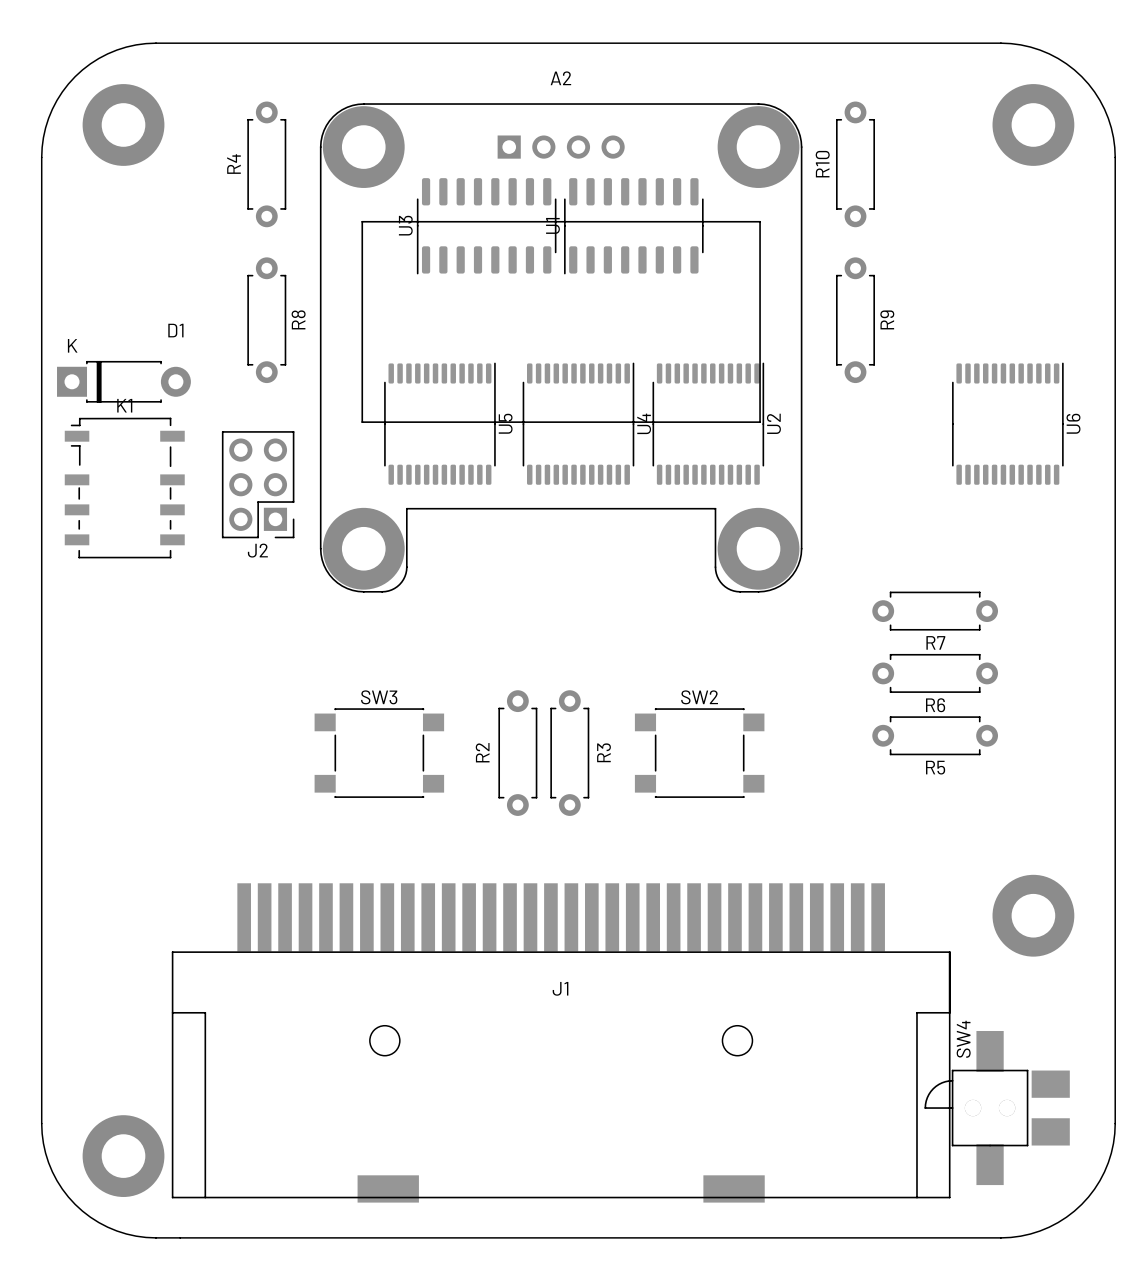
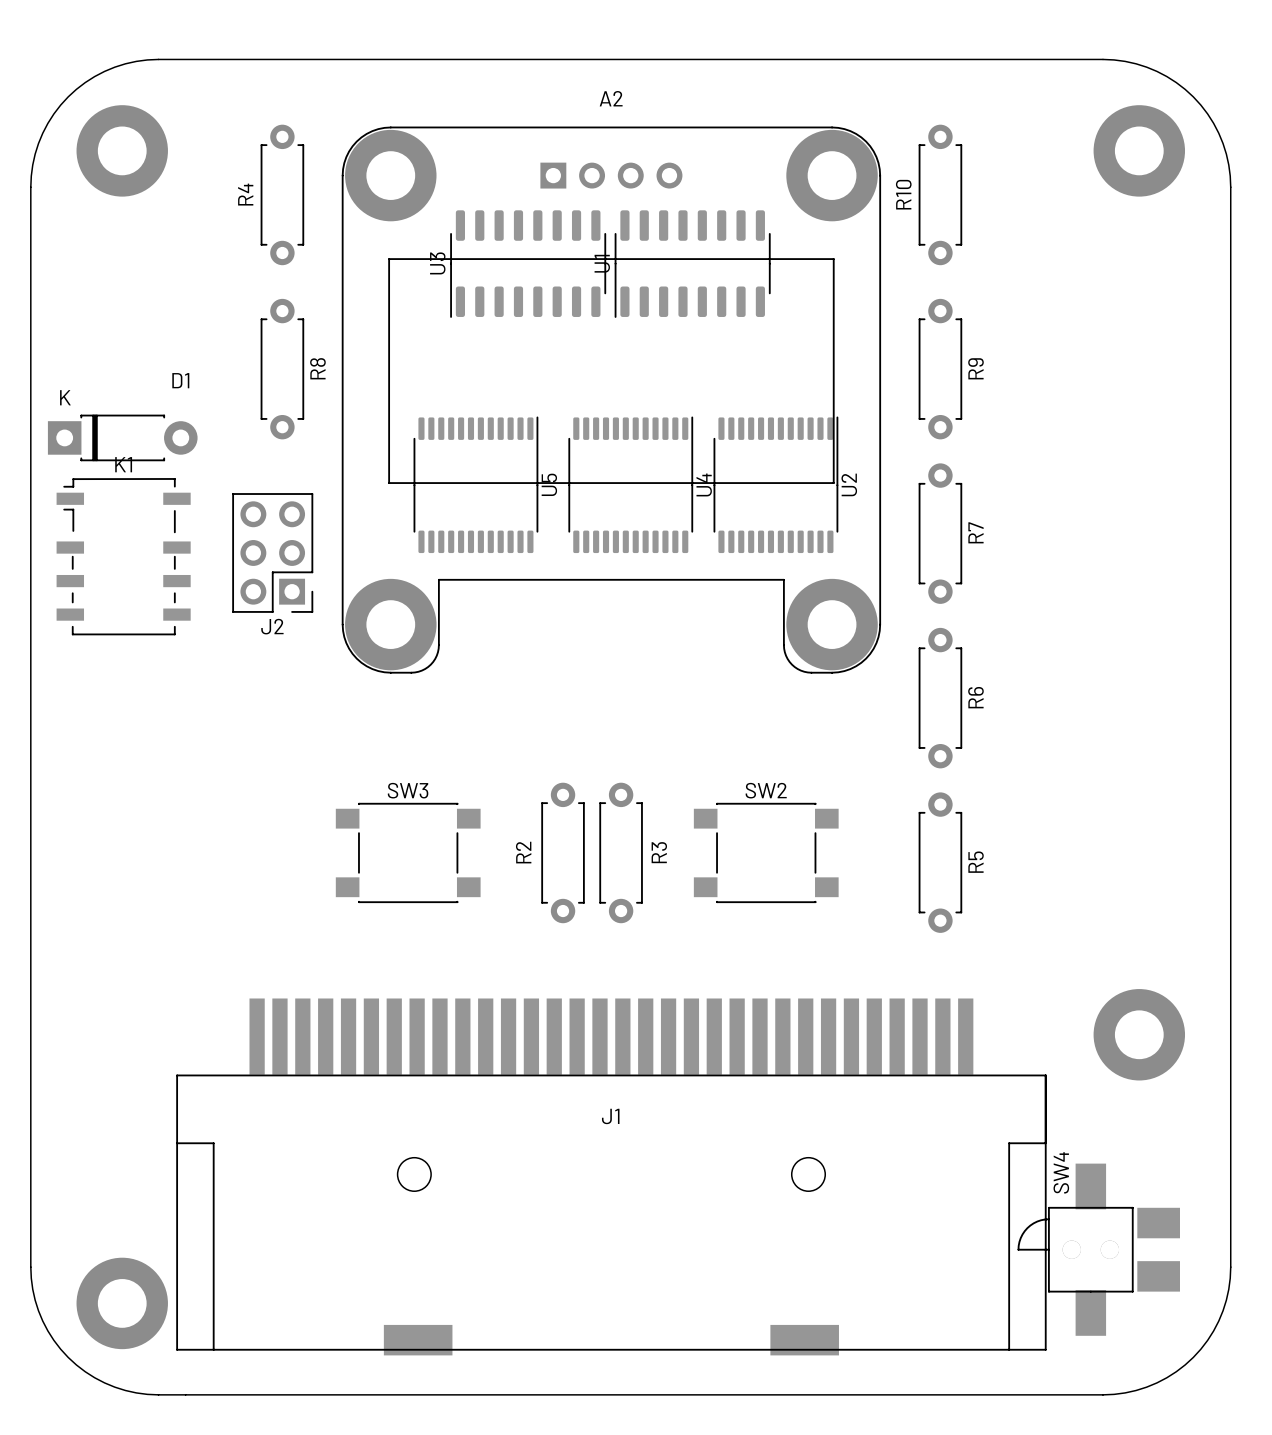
U6: (1007, 423) -> none
R7 rotation: 0° (935, 611) -> 90° clockwise (940, 533)
R7 position: (935, 611) -> (940, 533)
R7 name position: R7 (935, 642) -> R7 (975, 532)
R6 rotation: 0° (935, 673) -> 90° clockwise (940, 698)
R6 position: (935, 673) -> (940, 698)
R6 name position: R6 (935, 705) -> R6 (975, 697)
R5 rotation: 0° (935, 735) -> 90° clockwise (940, 862)
R5 position: (935, 735) -> (940, 862)
R5 name position: R5 (935, 767) -> R5 (976, 862)

